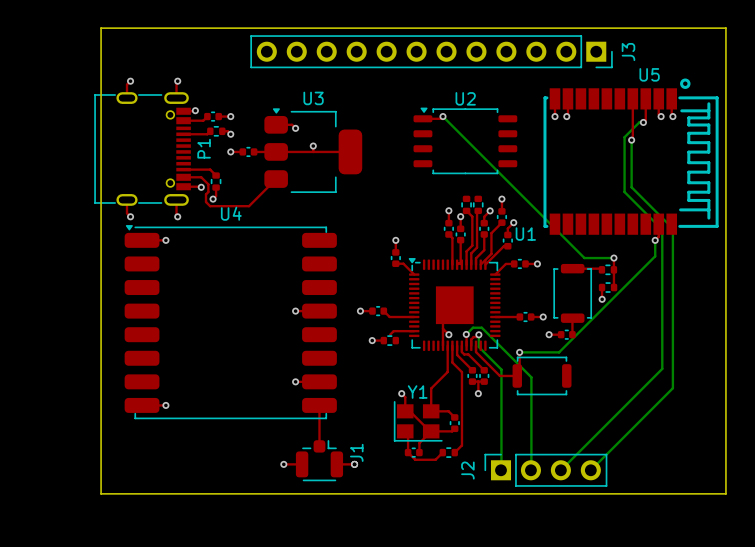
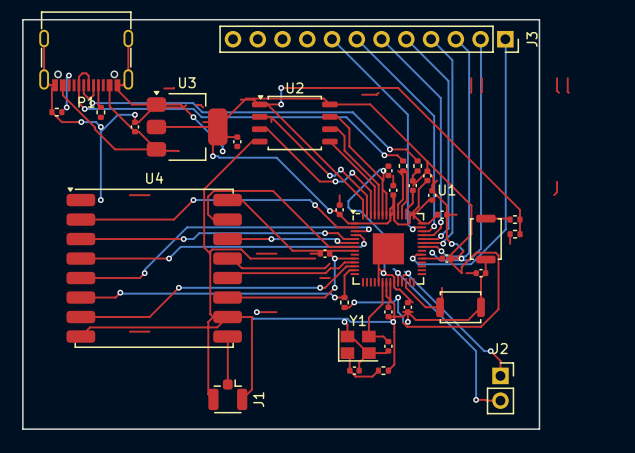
board edge: (101, 28) (101, 493) (725, 493) (725, 28) (637, 28) -> (95, 19) (22, 19) (22, 429) (539, 429) (539, 19)
top track: none -> (44, 38) (44, 79) (49, 85) (55, 85) (51, 88) (51, 112) (61, 122) (81, 122)
top track: none -> (128, 38) (128, 79) (122, 85) (117, 85) (117, 89) (132, 104) (180, 104) (193, 117)
bottom track: none -> (332, 39) (407, 114) (407, 224) (412, 229)
bottom track: none -> (357, 39) (434, 116) (434, 226)
bottom track: none -> (381, 39) (440, 98) (440, 222)
bottom track: none -> (406, 39) (448, 81) (448, 228) (441, 235)
bottom track: none -> (431, 39) (452, 60) (452, 232) (441, 243) (443, 243)
bottom track: none -> (456, 39) (469, 52) (469, 253) (465, 256) (446, 256) (441, 251)
bottom track: none -> (480, 39) (480, 248) (469, 260) (439, 260) (432, 252)
bottom track: none -> (505, 39) (505, 229) (471, 264) (418, 264) (412, 258)
top track: (130, 81) (127, 84) (127, 98) -> none
via: (130, 81) -> none
top track: (177, 81) (176, 98) -> none
via: (177, 81) -> none
bottom track: none -> (68, 75) (66, 77) (66, 107)
via: none -> (68, 75)
top track: (632, 98) (631, 140) -> none
top track: (645, 98) (645, 120) (643, 122) -> none
top track: none -> (62, 85) (62, 95) (114, 149) (156, 149) (109, 106) (109, 85)
top track: none -> (83, 85) (83, 93) (87, 97) (93, 95) (93, 85)
top track: none -> (88, 85) (88, 75) (82, 73) (78, 76) (78, 103) (84, 108)
top track: none -> (98, 85) (98, 104) (100, 107)
via: (195, 110) -> none
top track: none -> (281, 87) (398, 87) (519, 209)
bottom track: none -> (281, 87) (281, 104)
via: none -> (281, 87)
top track: (207, 116) (203, 120) (183, 120) -> none
part: (213, 116) -> none
top track: (218, 116) (230, 116) -> none
via: (230, 116) -> none
bottom track: (442, 116) (584, 258) (613, 258) -> none
via: (442, 116) -> none
via: (554, 116) -> none
via: (566, 116) -> none
via: (661, 116) -> none
via: (672, 116) -> none
bottom track: (643, 122) (639, 122) (624, 137) (624, 192) (662, 229) (662, 368) (560, 470) -> none
via: (643, 122) -> none
bottom track: none -> (92, 103) (193, 103) (202, 112) (352, 112) (389, 149)
via: none -> (92, 103)
via: (295, 128) -> none
top track: none -> (156, 104) (138, 122) (134, 122) (134, 114)
top track: none -> (259, 104) (281, 104)
top track: none -> (267, 104) (363, 199) (363, 215)
via: none -> (281, 104)
part: (216, 131) -> none
via: none -> (66, 107)
via: (230, 134) -> none
bottom track: none -> (84, 108) (193, 108) (201, 117) (346, 117) (384, 155)
via: none -> (84, 108)
part: none -> (56, 112)
part: none -> (100, 112)
U2 position: (465, 140) -> (294, 122)
bottom track: (631, 140) (631, 187) (672, 228) (672, 388) (590, 470) -> none
via: (631, 140) -> none
bottom track: none -> (134, 114) (117, 114) (100, 131)
via: none -> (134, 114)
top track: none -> (259, 116) (271, 116) (329, 175)
top track: none -> (329, 116) (337, 116) (349, 128) (349, 146) (382, 179) (382, 215)
bottom track: none -> (193, 117) (222, 146) (222, 151)
via: none -> (193, 117)
via: (313, 146) -> none
P1 rotation: 0° (142, 148) -> 90° clockwise (86, 51)
P1 position: (142, 148) -> (86, 51)
U3 position: (313, 150) -> (187, 125)
bottom track: none -> (81, 122) (95, 122) (100, 126) (100, 200)
via: none -> (81, 122)
via: (230, 151) -> none
part rotation: 0° (248, 151) -> 90° clockwise (237, 141)
part position: (248, 151) -> (237, 141)
top track: (254, 151) (350, 151) -> none
U5: (631, 156) -> none
via: none -> (100, 126)
part: none -> (134, 126)
top track: none -> (156, 126) (217, 126) (227, 137) (237, 137)
top track: none -> (259, 129) (267, 129) (319, 181) (335, 181)
top track: none -> (329, 129) (337, 129) (344, 136) (344, 150) (378, 184) (378, 215)
top track: (183, 169) (210, 169) (216, 175) -> none
top track: none -> (251, 141) (204, 189) (204, 247) (210, 253)
top track: none -> (329, 141) (374, 186) (374, 215)
top track: (183, 177) (201, 177) (208, 184) (206, 202) (210, 206) (249, 206) (276, 179) -> none
part: (216, 181) -> none
top track: none -> (389, 149) (406, 149) (417, 160)
via: none -> (389, 149)
via: (201, 187) -> none
top track: (216, 187) (216, 196) (213, 199) -> none
via: none -> (222, 151)
top track: none -> (384, 155) (397, 155) (403, 160)
via: none -> (384, 155)
top track: none -> (212, 156) (212, 131) (246, 98) (324, 98) (329, 104) (370, 104) (471, 205) (471, 234) (447, 258) (461, 273) (461, 267) (475, 252) (495, 252) (498, 255) (498, 309) (480, 326) (407, 326) (403, 322)
bottom track: none -> (212, 156) (276, 157) (329, 210)
via: none -> (212, 156)
top track: (127, 199) (127, 213) (130, 216) -> none
top track: (176, 199) (177, 216) -> none
via: (213, 199) -> none
via: (501, 199) -> none
part: (466, 204) -> none
part: none -> (403, 165)
part: (478, 204) -> none
part: none -> (417, 165)
bottom track: none -> (380, 169) (348, 201) (348, 207) (351, 210) (360, 210) (384, 235) (384, 269)
top track: none -> (340, 169) (366, 195) (366, 215)
bottom track: none -> (340, 169) (334, 175) (329, 175)
via: none -> (340, 169)
via: (490, 210) -> none
top track: none -> (352, 172) (370, 191) (370, 215)
bottom track: none -> (352, 172) (343, 181) (335, 181)
via: none -> (352, 172)
via: (130, 216) -> none
via: (177, 216) -> none
via: none -> (329, 175)
via: (460, 216) -> none
via: (513, 222) -> none
via: none -> (335, 181)
part position: (448, 228) -> (388, 170)
top track: none -> (412, 185) (427, 171) (433, 177) (432, 190) (446, 205) (446, 239) (451, 243)
via: (165, 240) -> none
via: (395, 240) -> none
bottom track: (655, 240) (655, 256) (559, 352) (519, 352) -> none
via: (655, 240) -> none
via: none -> (100, 200)
top track: none -> (193, 200) (173, 219) (80, 219)
bottom track: none -> (193, 200) (309, 200) (315, 205)
via: none -> (193, 200)
top track: none -> (227, 200) (241, 200) (292, 250) (354, 250)
top track: none -> (315, 205) (337, 227) (354, 227)
via: none -> (315, 205)
top track: none -> (394, 204) (390, 208) (390, 220) (387, 223) (348, 223) (339, 214)
via: (613, 258) -> none
via: none -> (329, 210)
top track: (395, 263) (403, 263) (414, 274) -> (339, 214) (336, 210) (329, 210)
top track: (514, 263) (505, 263) (495, 274) -> (437, 214) (428, 223) (421, 223) (413, 215) (409, 215) (407, 224) (398, 224) (394, 220) (393, 194)
via: (537, 263) -> none
top track: none -> (227, 219) (213, 219) (208, 214) (208, 196) (213, 190) (273, 190) (328, 246) (354, 246)
top track: none -> (440, 222) (440, 227) (433, 235) (421, 235)
via: none -> (440, 222)
top track: none -> (434, 226) (429, 231) (421, 231)
via: none -> (434, 226)
top track: none -> (421, 227) (412, 229)
top track: none -> (368, 229) (366, 231) (354, 231)
bottom track: none -> (368, 229) (366, 227) (187, 227) (144, 269) (144, 273)
via: none -> (368, 229)
via: none -> (412, 229)
top track: none -> (325, 233) (337, 233) (343, 239) (354, 239)
bottom track: none -> (325, 233) (199, 233) (193, 239) (183, 239)
via: none -> (325, 233)
top track: none -> (354, 235) (360, 235) (364, 239) (364, 243)
top track: none -> (441, 235) (437, 239) (421, 239)
via: none -> (441, 235)
top track: none -> (80, 239) (183, 239)
via: none -> (183, 239)
top track: none -> (227, 239) (271, 239)
bottom track: none -> (271, 239) (335, 239) (337, 241)
top track: none -> (337, 241) (339, 242) (354, 242)
via: none -> (337, 241)
top track: none -> (421, 242) (443, 243)
via: none -> (443, 243)
bottom track: none -> (364, 243) (361, 246) (180, 246) (169, 258)
via: none -> (364, 243)
bottom track: none -> (451, 243) (456, 243) (463, 250)
via: none -> (451, 243)
via: (602, 299) -> none
top track: none -> (421, 246) (437, 246) (441, 251)
top track: none -> (463, 250) (456, 258)
via: none -> (441, 251)
via: none -> (432, 252)
via position: (295, 311) -> (271, 239)
via: (360, 311) -> none
top track: none -> (421, 254) (416, 254) (412, 258)
top track: none -> (80, 258) (169, 258)
via: none -> (169, 258)
top track: none -> (227, 258) (232, 258) (241, 268) (325, 268) (329, 263)
top track: none -> (315, 258) (250, 258) (241, 249) (212, 249) (210, 251) (210, 314) (213, 317)
bottom track: none -> (334, 258) (334, 287)
via: none -> (334, 258)
via: none -> (412, 258)
top track: none -> (354, 262) (344, 262) (338, 268) (330, 268) (325, 273) (232, 273) (227, 278)
U4 position: (230, 322) -> (154, 267)
top track: none -> (354, 266) (346, 266) (325, 287) (320, 287)
top track: none -> (384, 269) (387, 275) (394, 277) (394, 282)
top track: (407, 331) (393, 331) (390, 334) -> (349, 270) (344, 275) (344, 297) (334, 297)
bottom track: none -> (404, 271) (484, 351) (490, 351)
top track: none -> (144, 273) (139, 278) (80, 278)
via: none -> (144, 273)
bottom track: (466, 334) (472, 327) (481, 327) (531, 377) (531, 470) -> none
bottom track: (478, 334) (478, 346) -> (393, 269) (408, 283)
via: (549, 334) -> none
top track: none -> (485, 273) (480, 277) (480, 307) (468, 319) (415, 319) (407, 311) (403, 316) (388, 316) (393, 321)
via: (372, 340) -> none
part rotation: 0° (389, 340) -> 90° clockwise (344, 302)
part position: (389, 340) -> (344, 302)
top track: none -> (178, 287) (149, 317) (80, 317)
bottom track: none -> (178, 287) (320, 287)
via: none -> (178, 287)
via: none -> (320, 287)
top track: none -> (334, 287) (325, 297) (227, 297)
via: none -> (334, 287)
via: (519, 352) -> none
top track: (457, 354) (472, 370) -> (390, 289) (388, 307)
top track: none -> (120, 292) (115, 297) (80, 297)
bottom track: none -> (120, 292) (330, 293) (334, 297)
via: none -> (120, 292)
via: none -> (334, 297)
via: none -> (398, 297)
bottom track: (501, 369) (501, 470) -> (426, 302) (476, 351) (476, 399)
top track: none -> (354, 302) (349, 307) (344, 307)
bottom track: none -> (354, 302) (393, 302) (398, 297) (398, 312) (403, 317) (403, 322)
via: none -> (354, 302)
part: (472, 375) -> none
part: none -> (407, 307)
part: (484, 375) -> none
part: none -> (388, 311)
top track: none -> (213, 317) (251, 317) (251, 389) (242, 399)
top track: none -> (213, 317) (208, 321) (208, 394) (213, 399)
top track: none -> (227, 317) (217, 327) (89, 327) (80, 336)
bottom track: none -> (251, 317) (253, 318) (347, 318) (350, 321) (393, 321)
via: none -> (393, 321)
via: (165, 405) -> none
top track: (319, 405) (319, 446) -> none
top track: none -> (227, 336) (227, 384)
top track: none -> (490, 351) (500, 360) (500, 375)
via: none -> (490, 351)
J1 name position: J1 (356, 452) -> J1 (258, 399)
J2 footprint: [484, 453, 608, 487] -> [486, 362, 515, 415]
J1 position: (319, 460) -> (227, 396)
top track: (283, 464) (302, 464) -> none
via: (283, 464) -> none
top track: (336, 464) (354, 464) -> none
via: (354, 464) -> none
J2 name position: J2 (467, 470) -> J2 (500, 348)
top track: none -> (476, 399) (500, 400)
via: none -> (476, 399)

